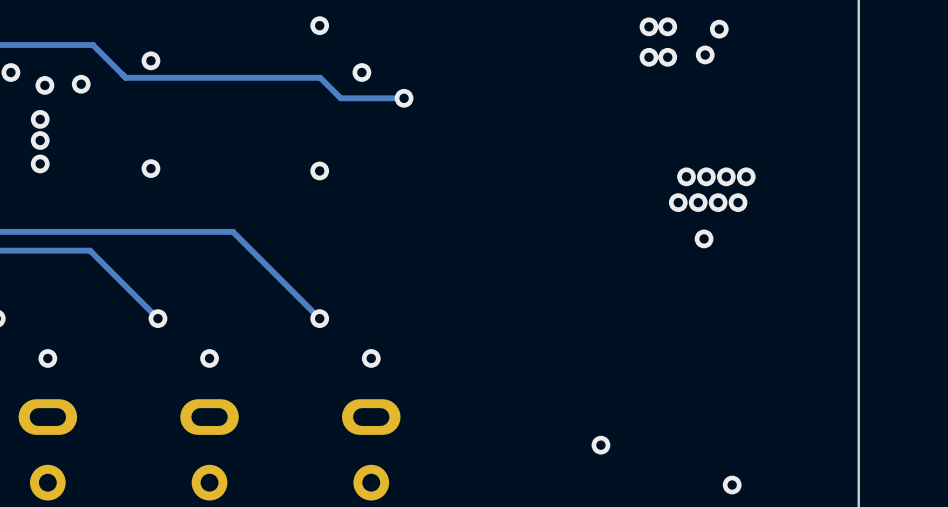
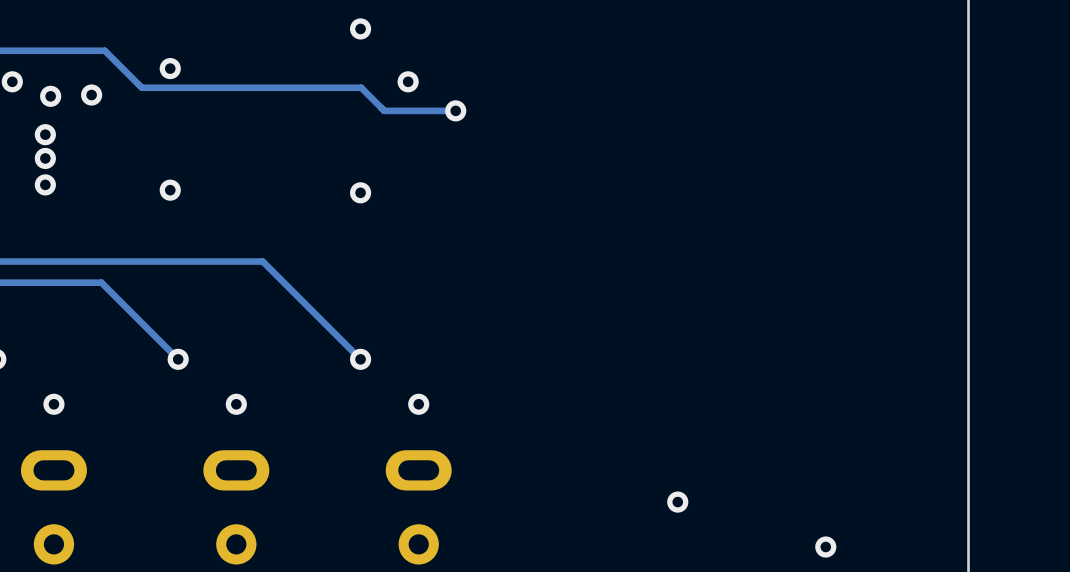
via: (648, 26) -> none
via: (667, 26) -> none
via: (719, 29) -> none
via: (705, 54) -> none
via: (648, 57) -> none
via: (667, 57) -> none
via: (686, 176) -> none
via: (706, 176) -> none
via: (726, 176) -> none
via: (746, 176) -> none
via: (678, 202) -> none
via: (698, 202) -> none
via: (718, 202) -> none
via: (738, 202) -> none
via: (704, 238) -> none

